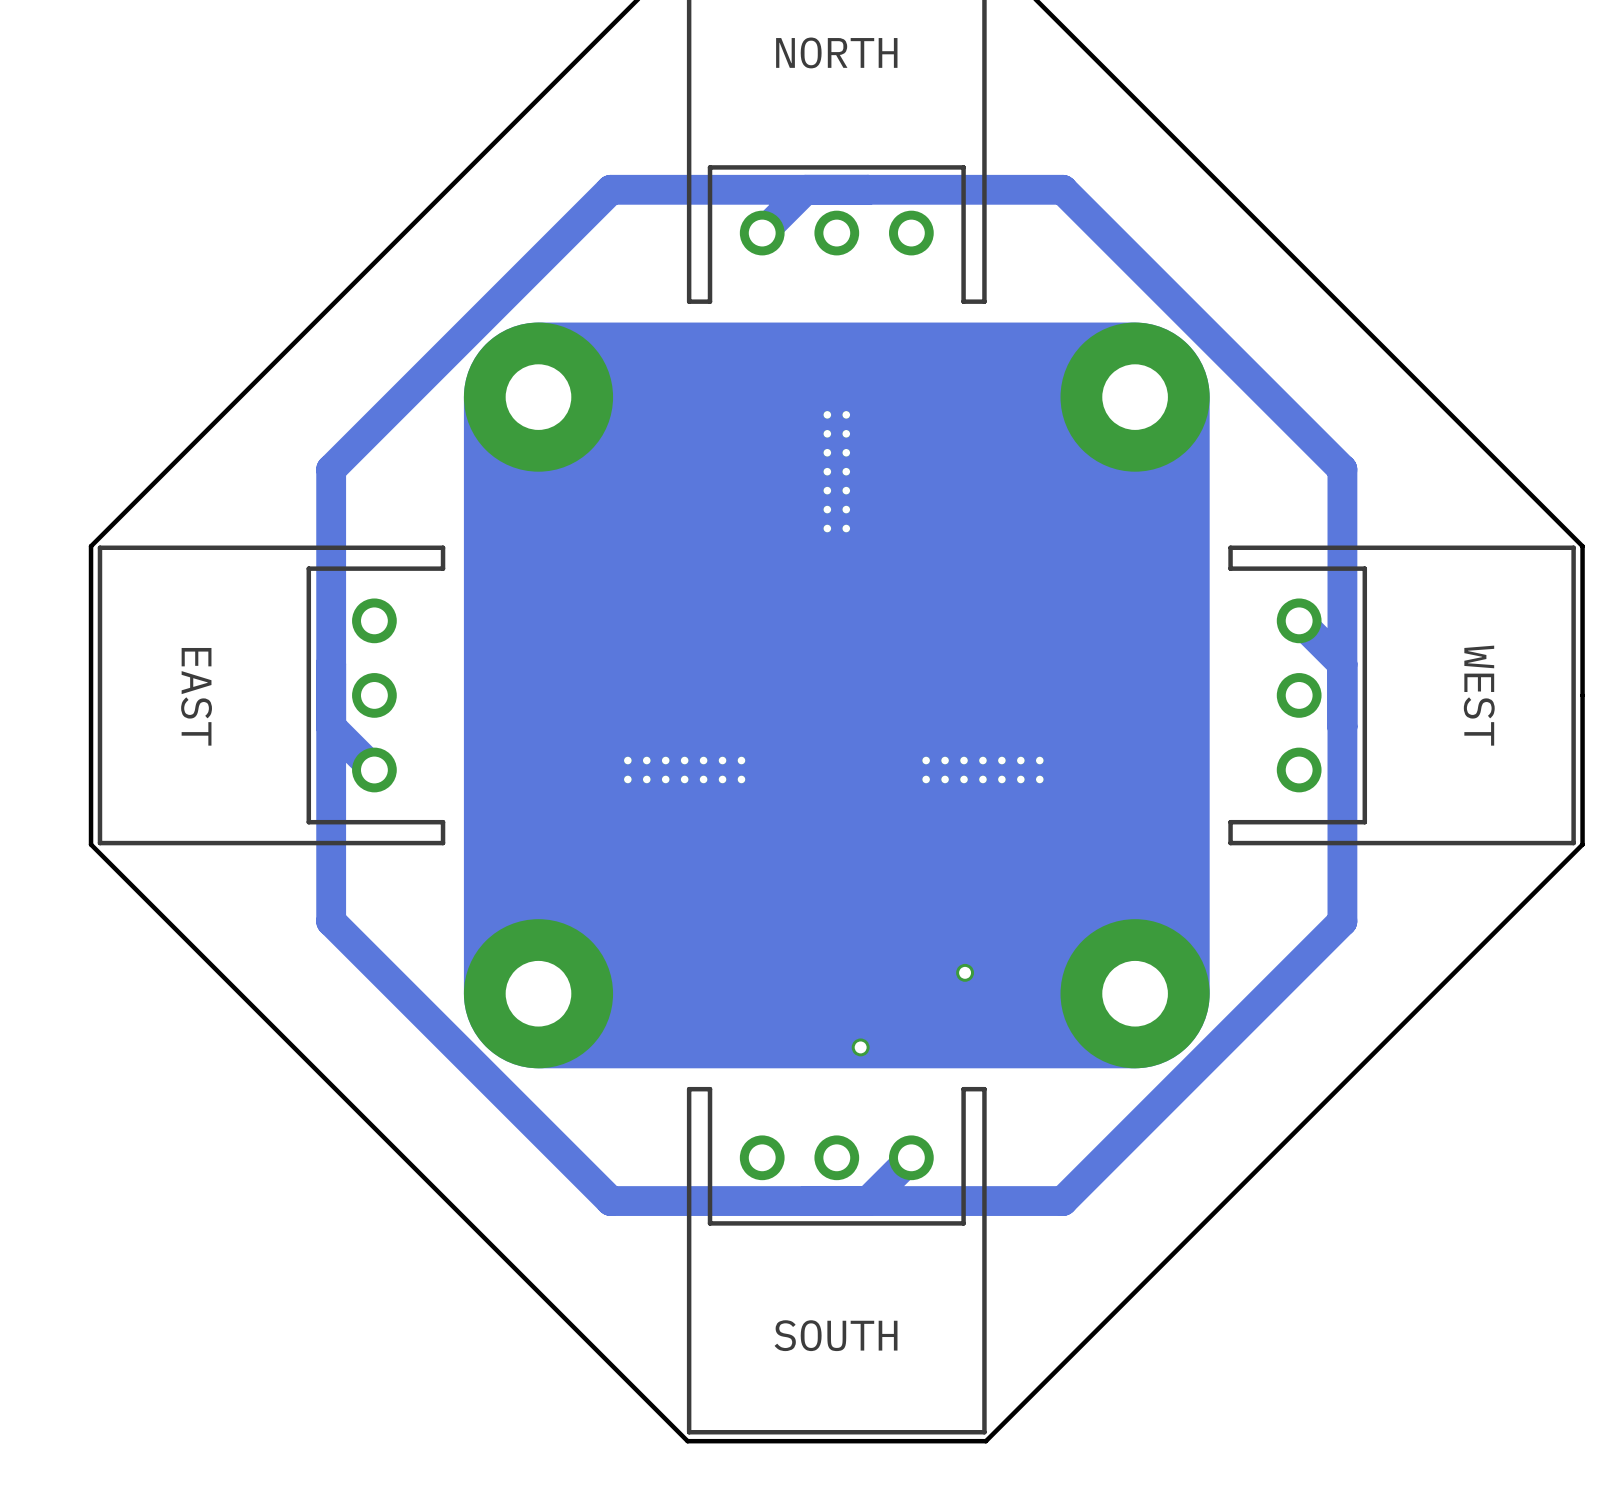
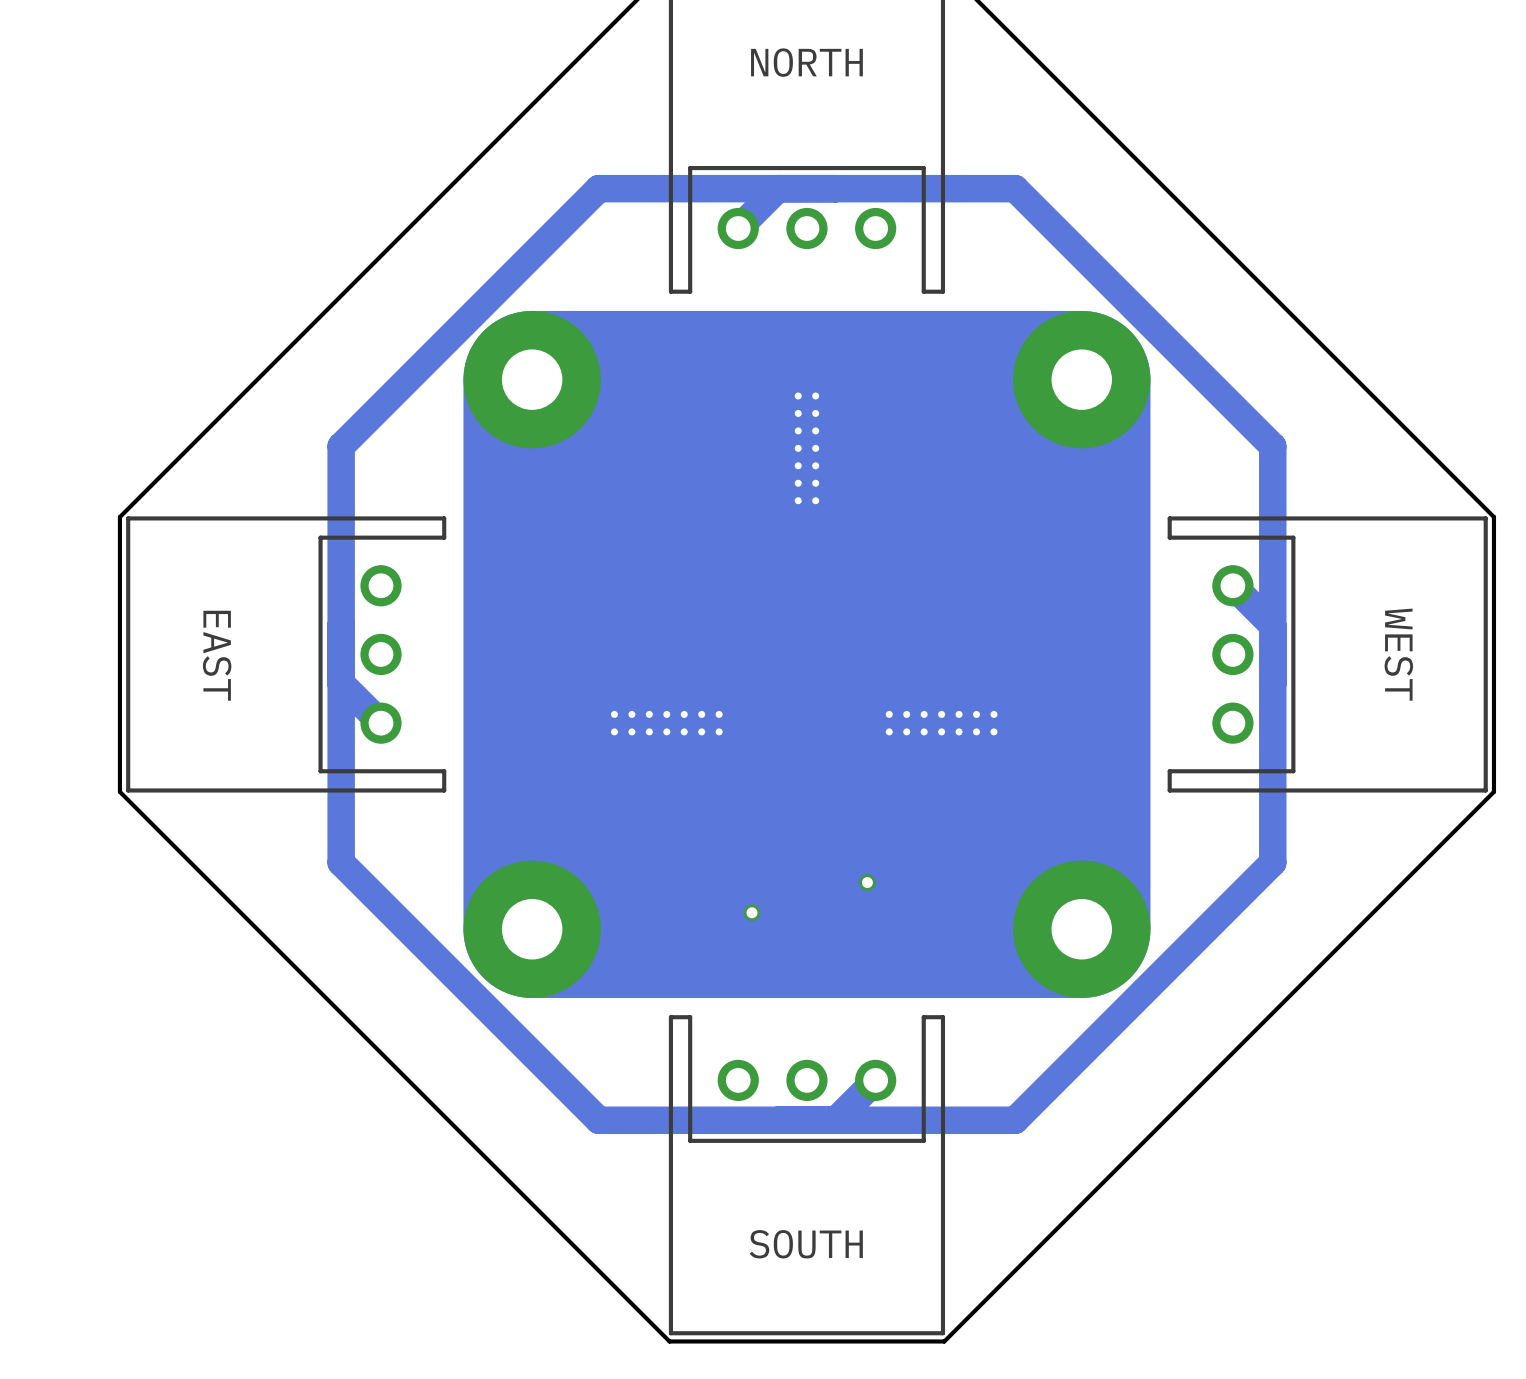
via: none -> (867, 882)
via: (965, 972) -> none
via: none -> (751, 912)
via: (860, 1047) -> none

